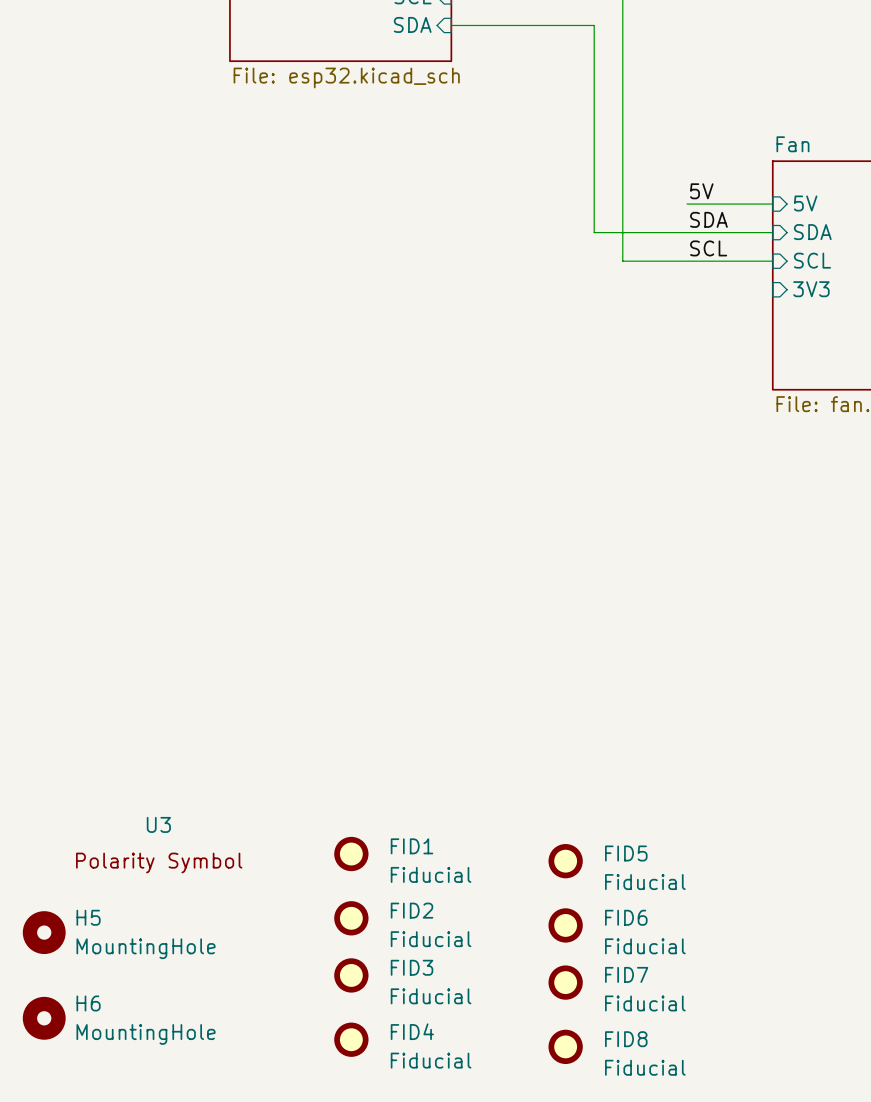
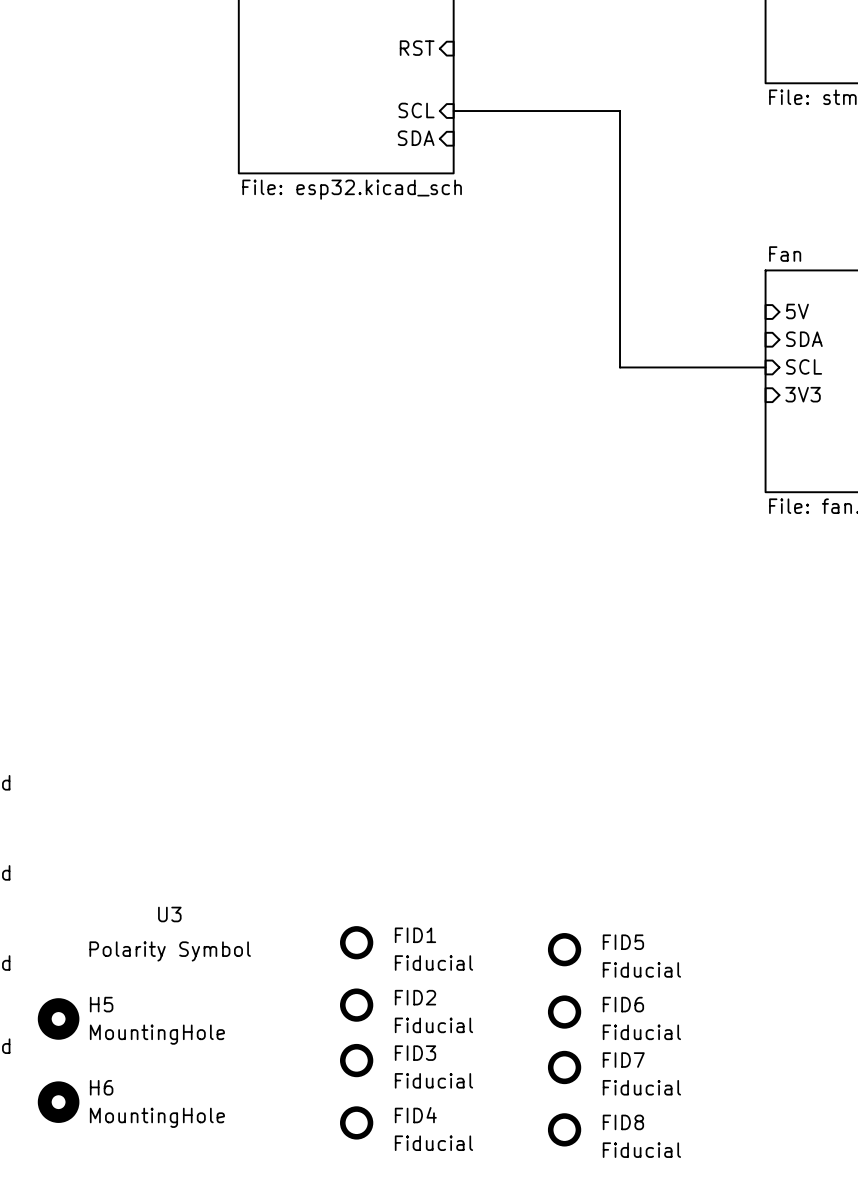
wire: (451, 25) (594, 25) (594, 232) (772, 232) -> none
label: 5V (701, 191) -> none
wire: (687, 204) (772, 204) -> none
label: SDA (708, 219) -> none
label: SCL (708, 248) -> none

